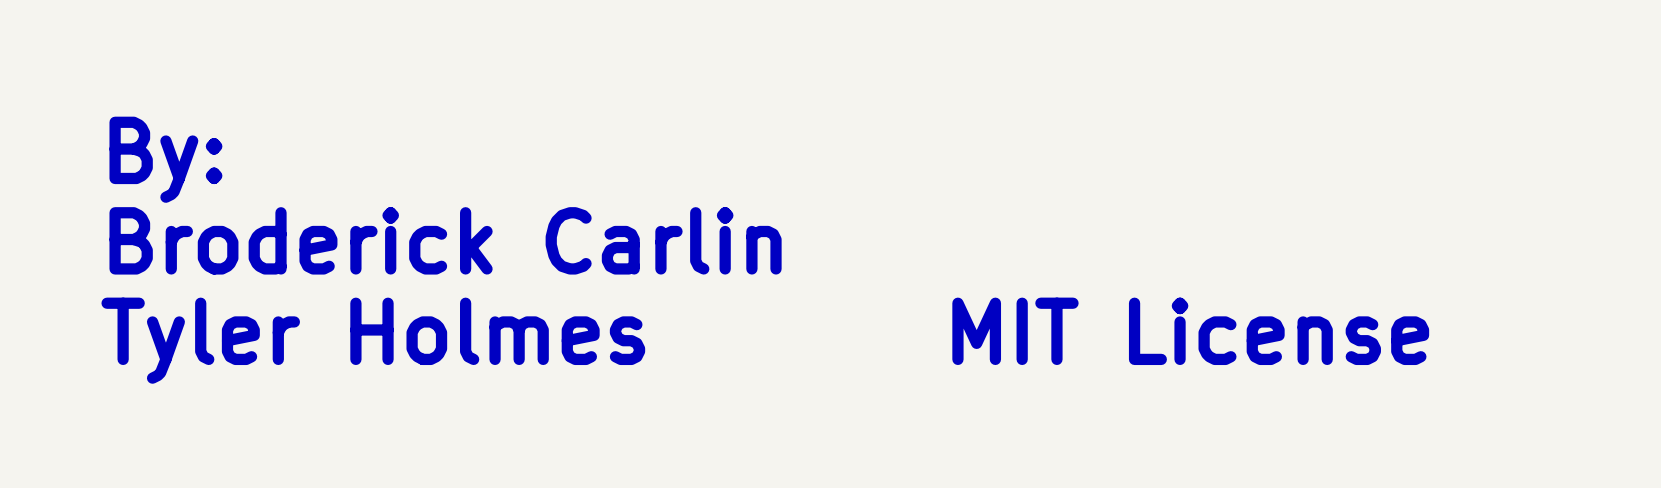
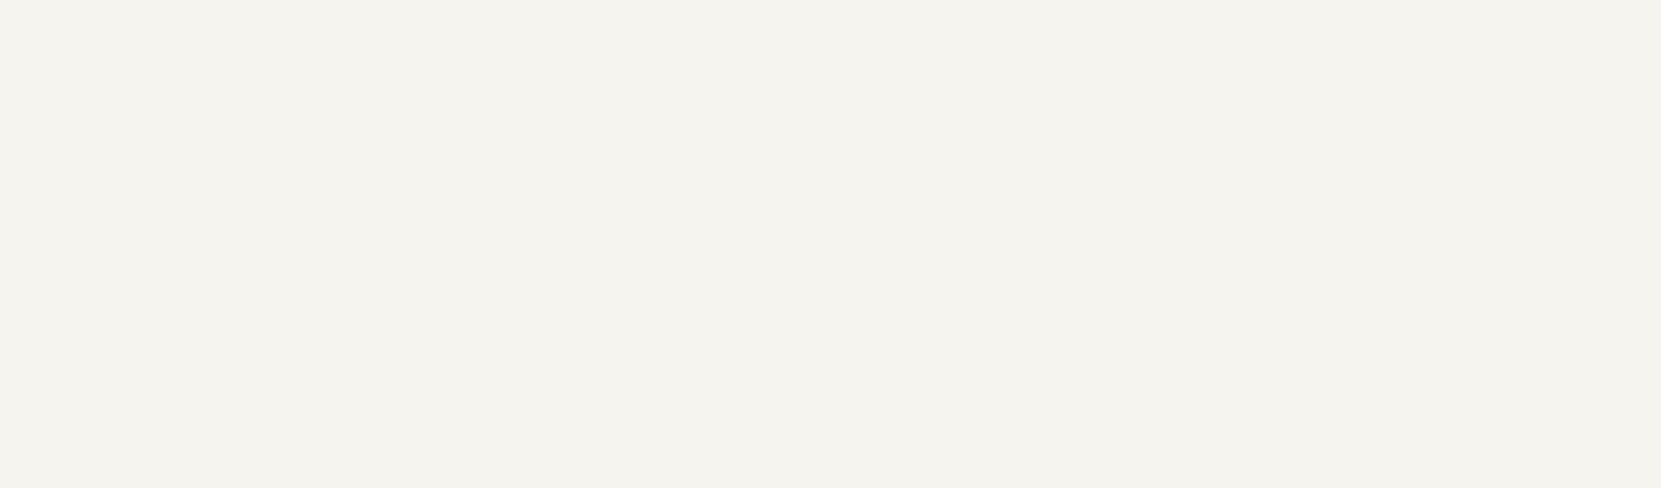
text: By: (165, 159) -> none
text: Broderick Carlin (445, 240) -> none
text: MIT License (1190, 331) -> none
text: Tyler Holmes (373, 340) -> none

